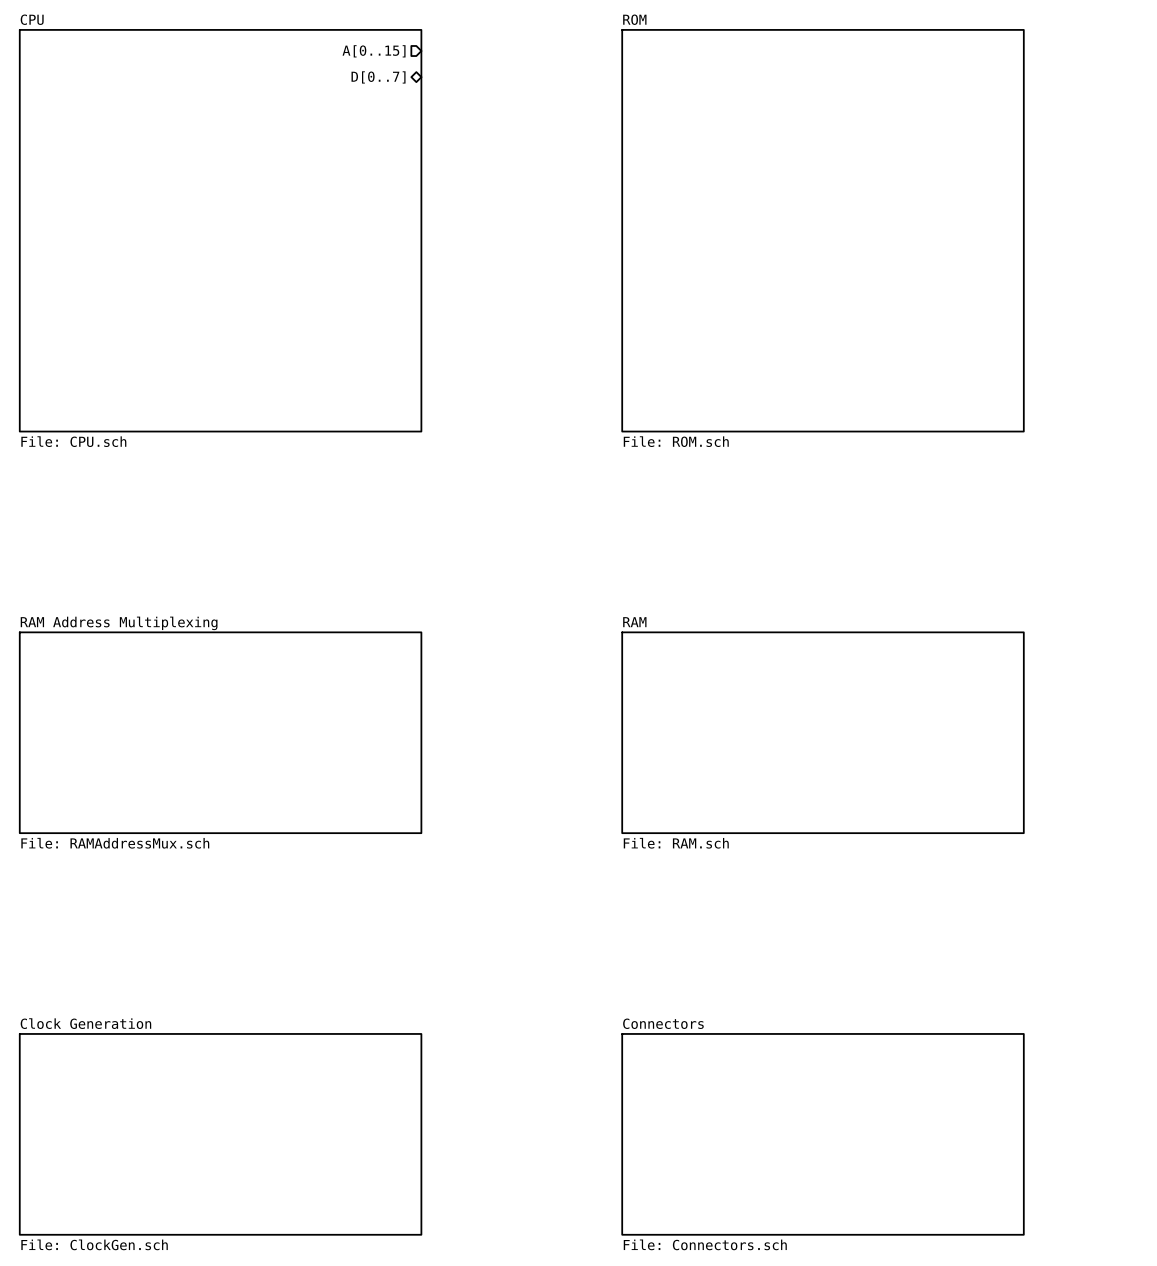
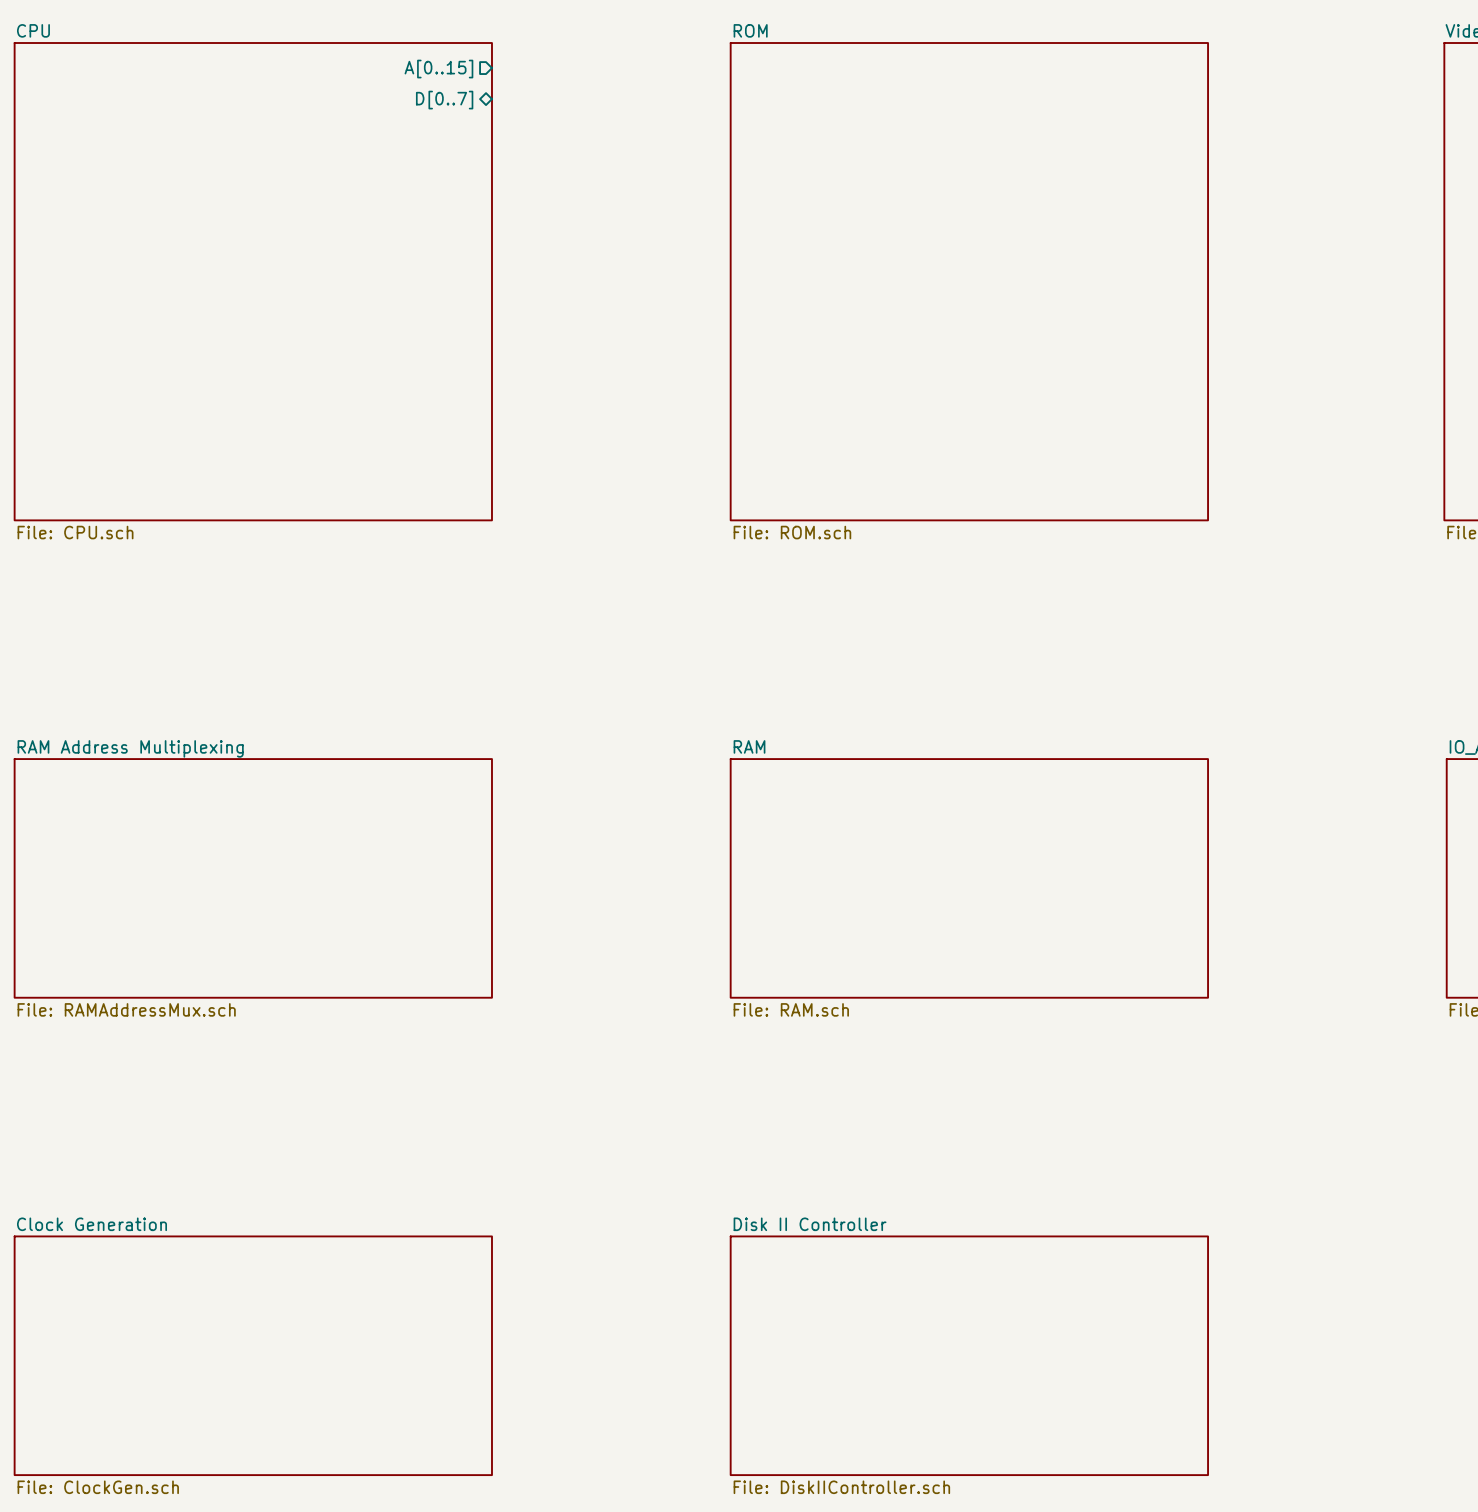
sheet Connectors name: Connectors (663, 1023) -> Disk II Controller (810, 1224)
sheet Connectors value: File: Connectors.sch (705, 1244) -> File: DiskIIController.sch (841, 1487)

